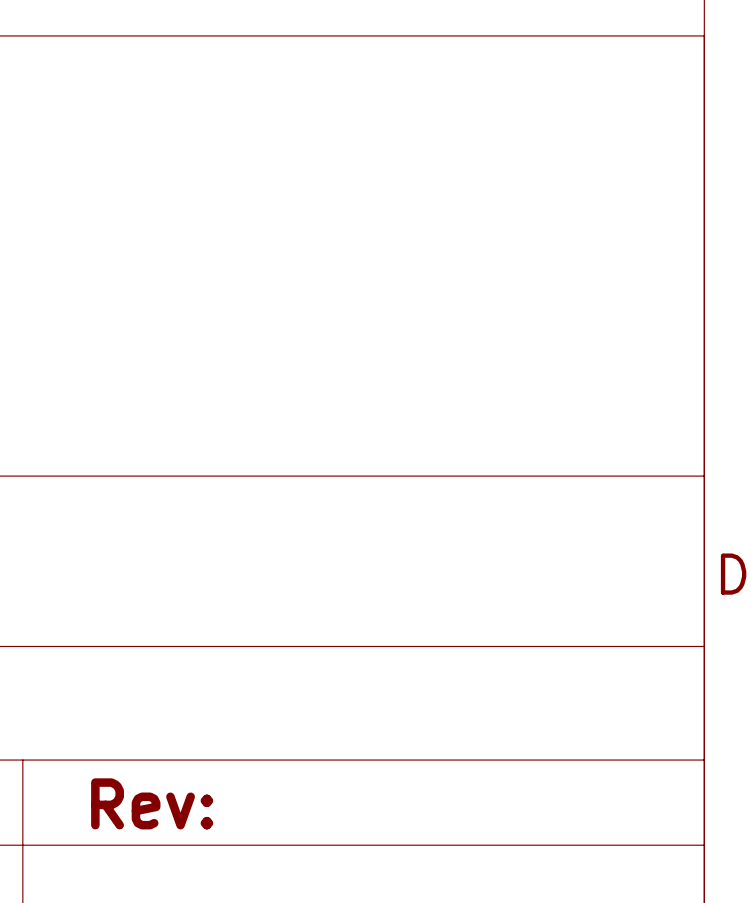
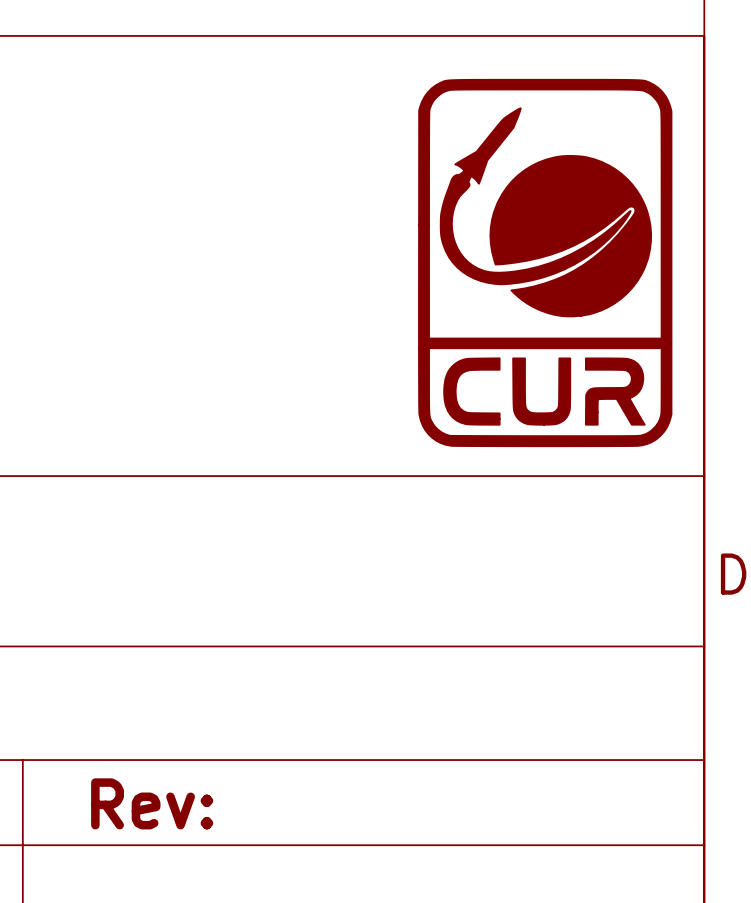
power symbol: none -> (545, 263)

